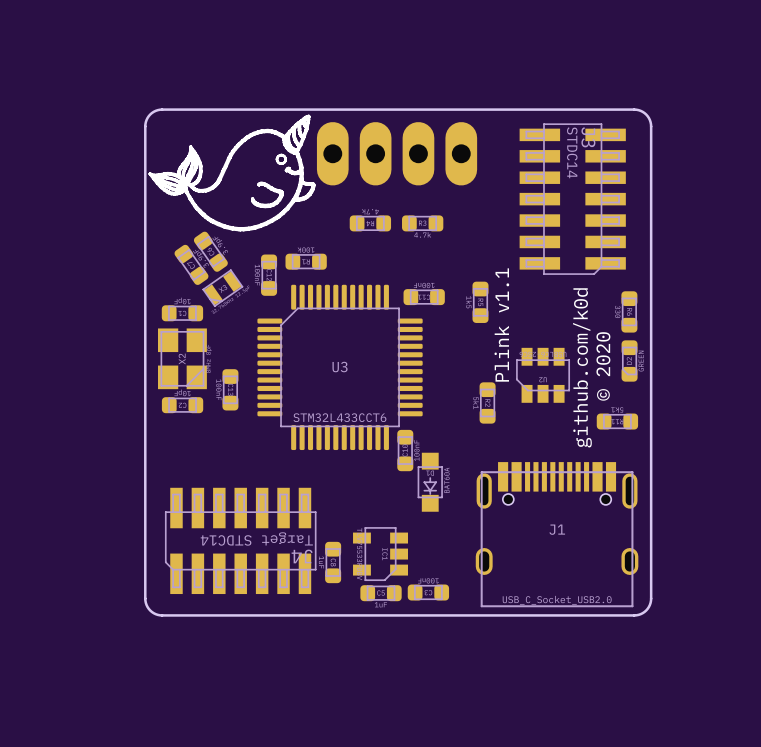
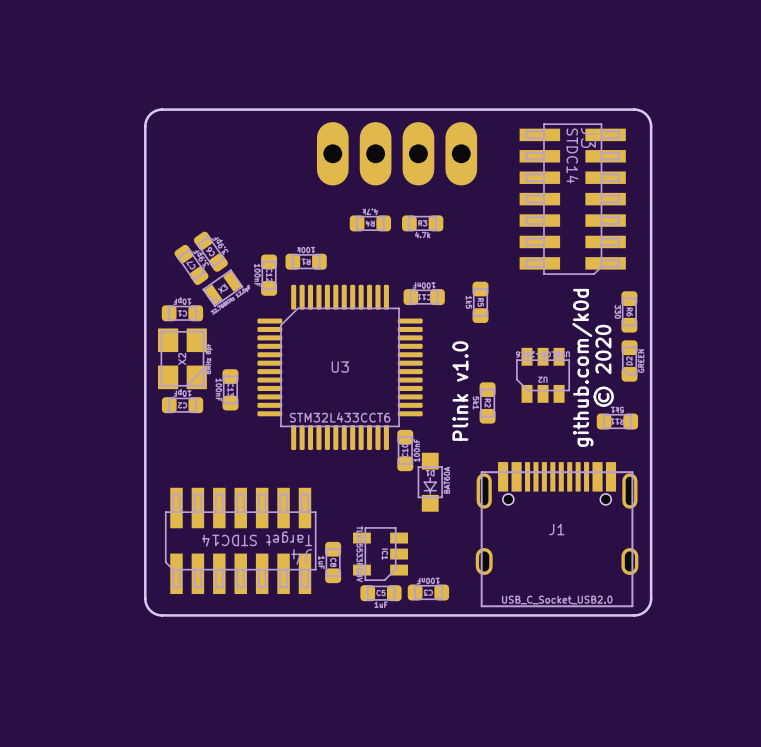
drawing: [148, 114, 316, 232] -> none
text: Plink v1.1 (501, 325) -> none
text: none -> Plink v1.0 (460, 391)

